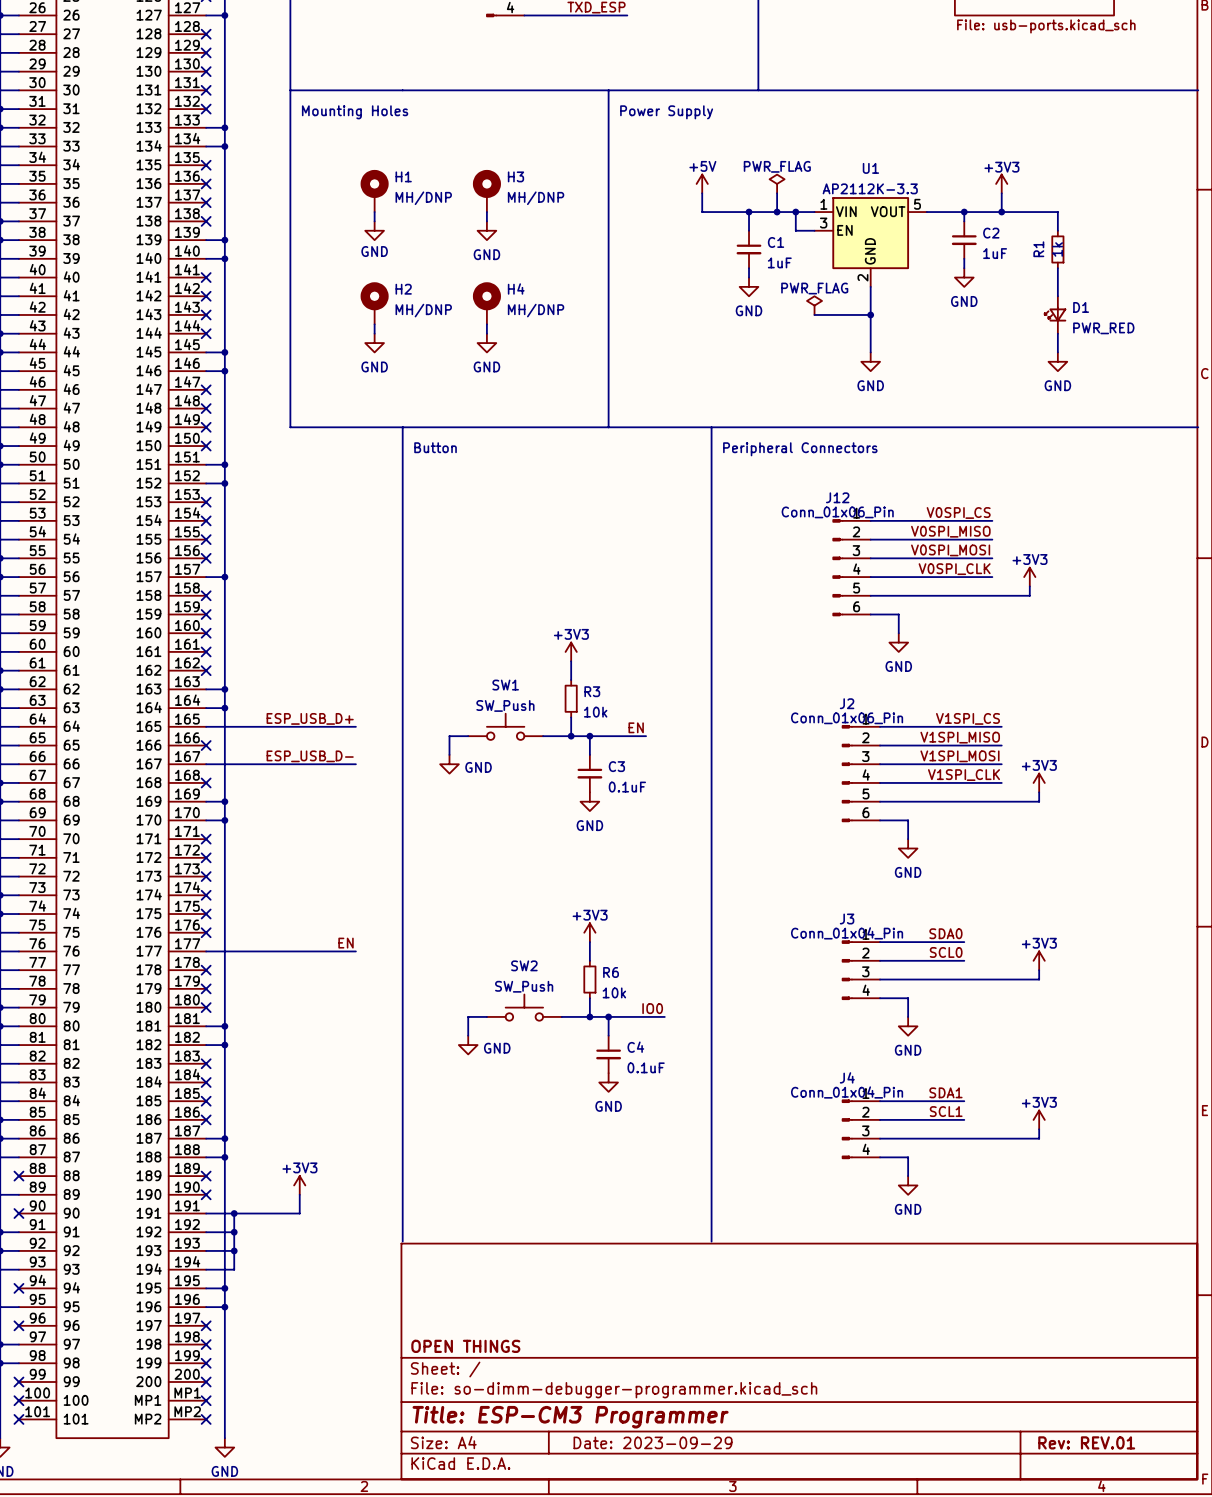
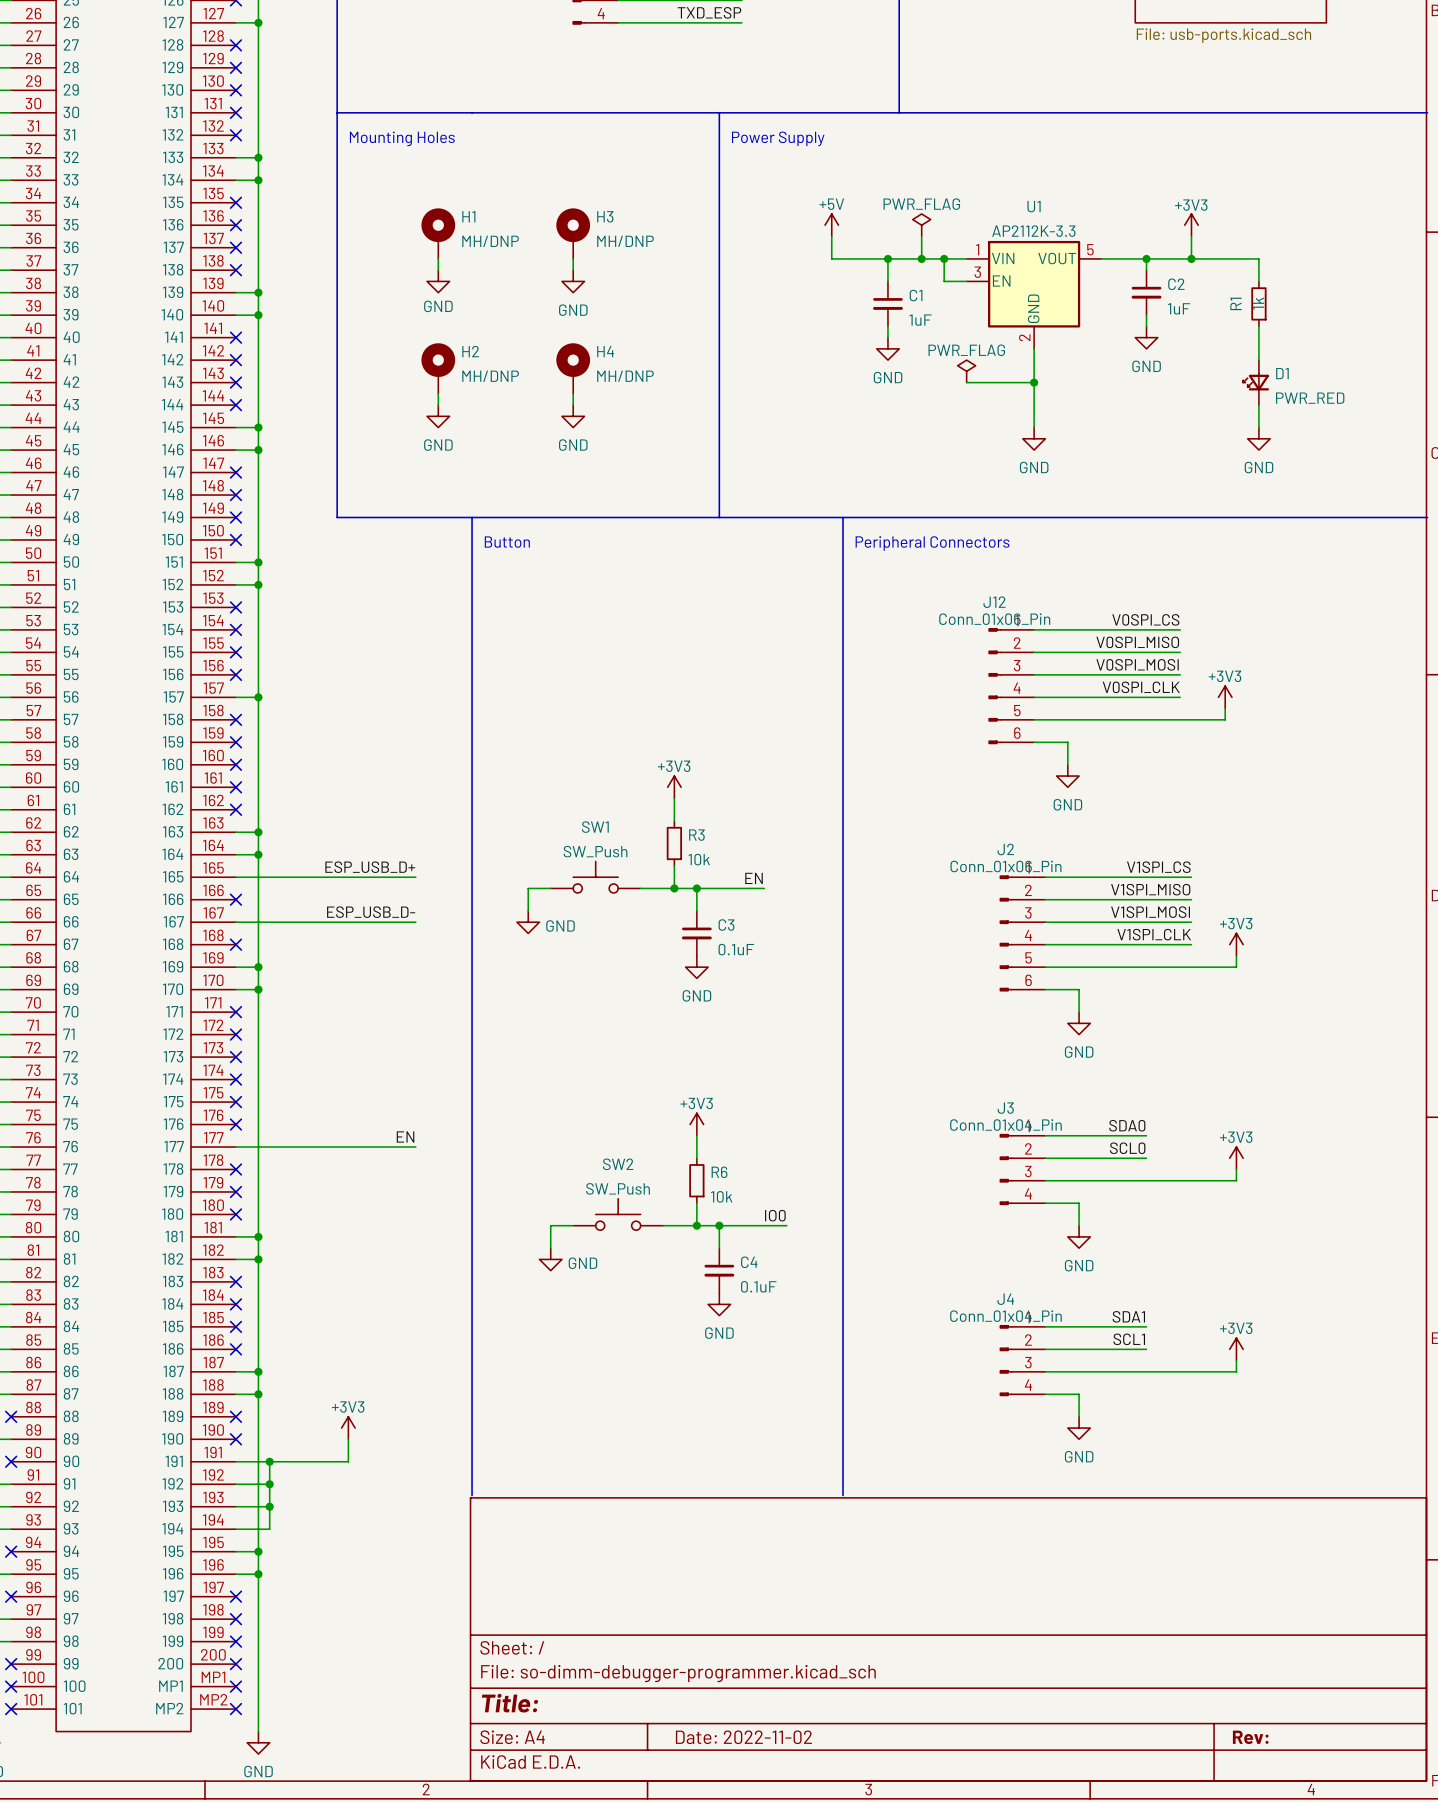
title block: OPEN THINGS (465, 1346) -> none
title block: Title: ESP-CM3 Programmer (570, 1417) -> Title: (510, 1703)
title block: Date: 2023-09-29 (653, 1442) -> Date: 2022-11-02 (743, 1737)
title block: Rev: REV.01 (1086, 1442) -> Rev: (1250, 1737)

